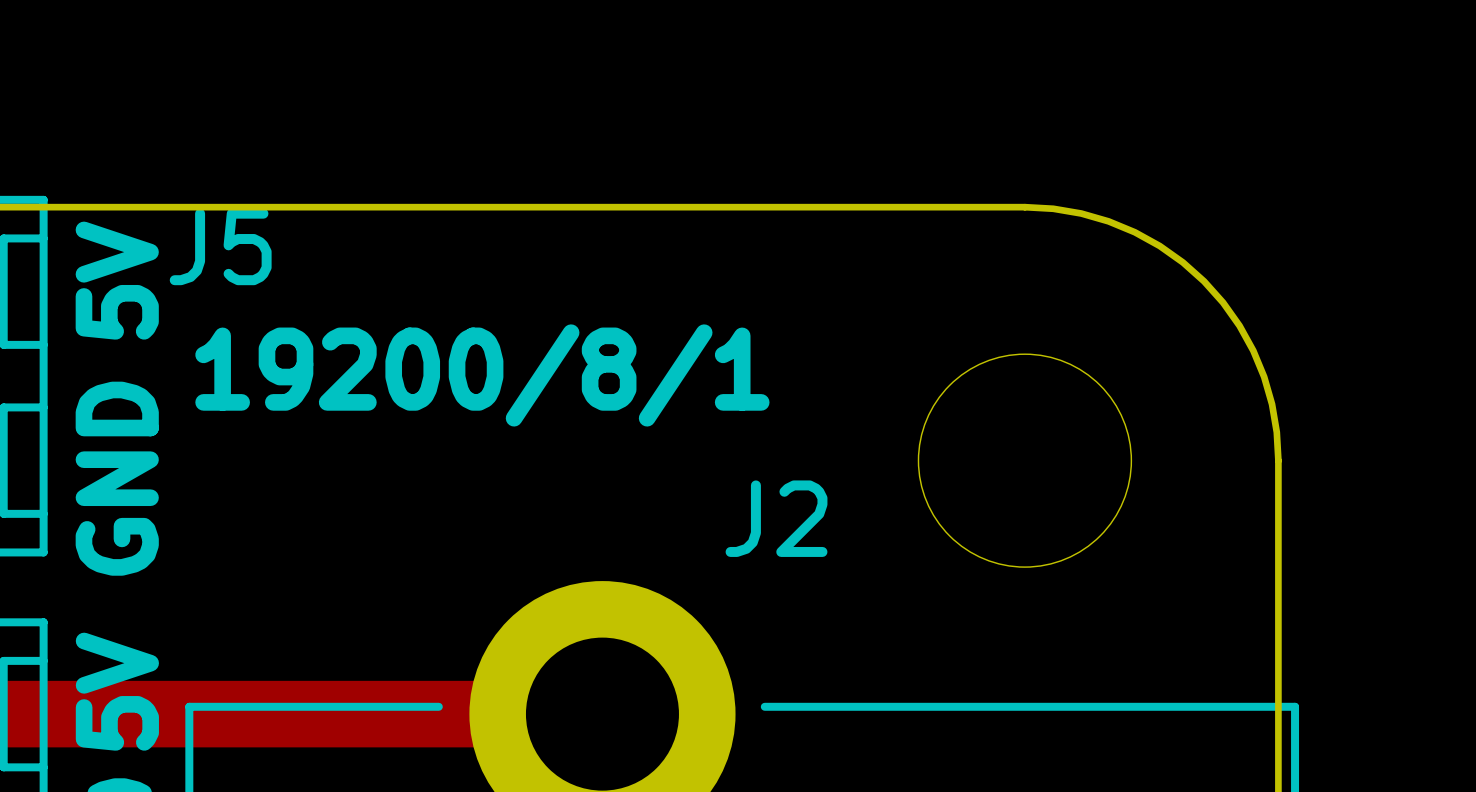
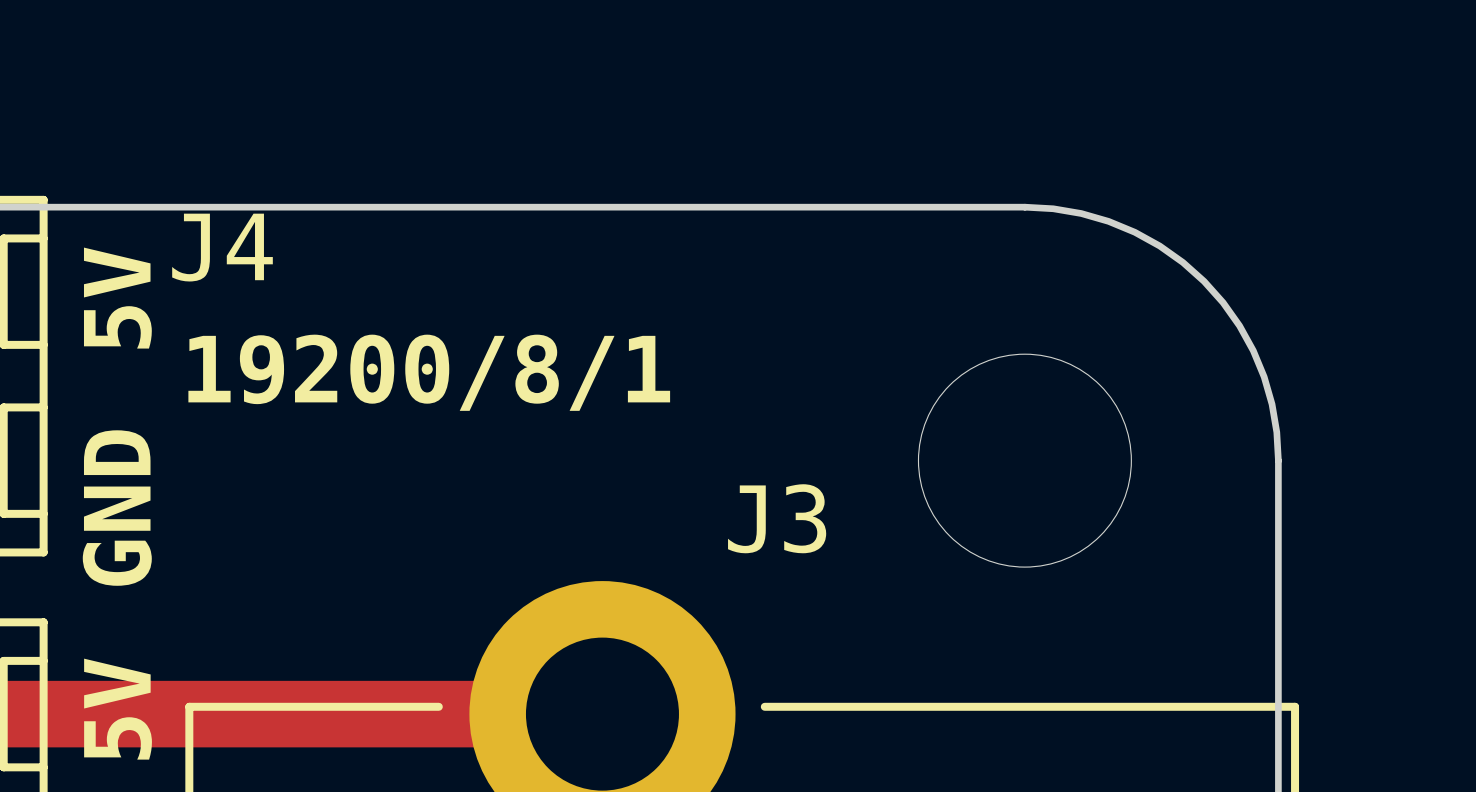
J5 name: J5 (220, 246) -> J4 (222, 247)
J2 name: J2 (776, 518) -> J3 (777, 518)

